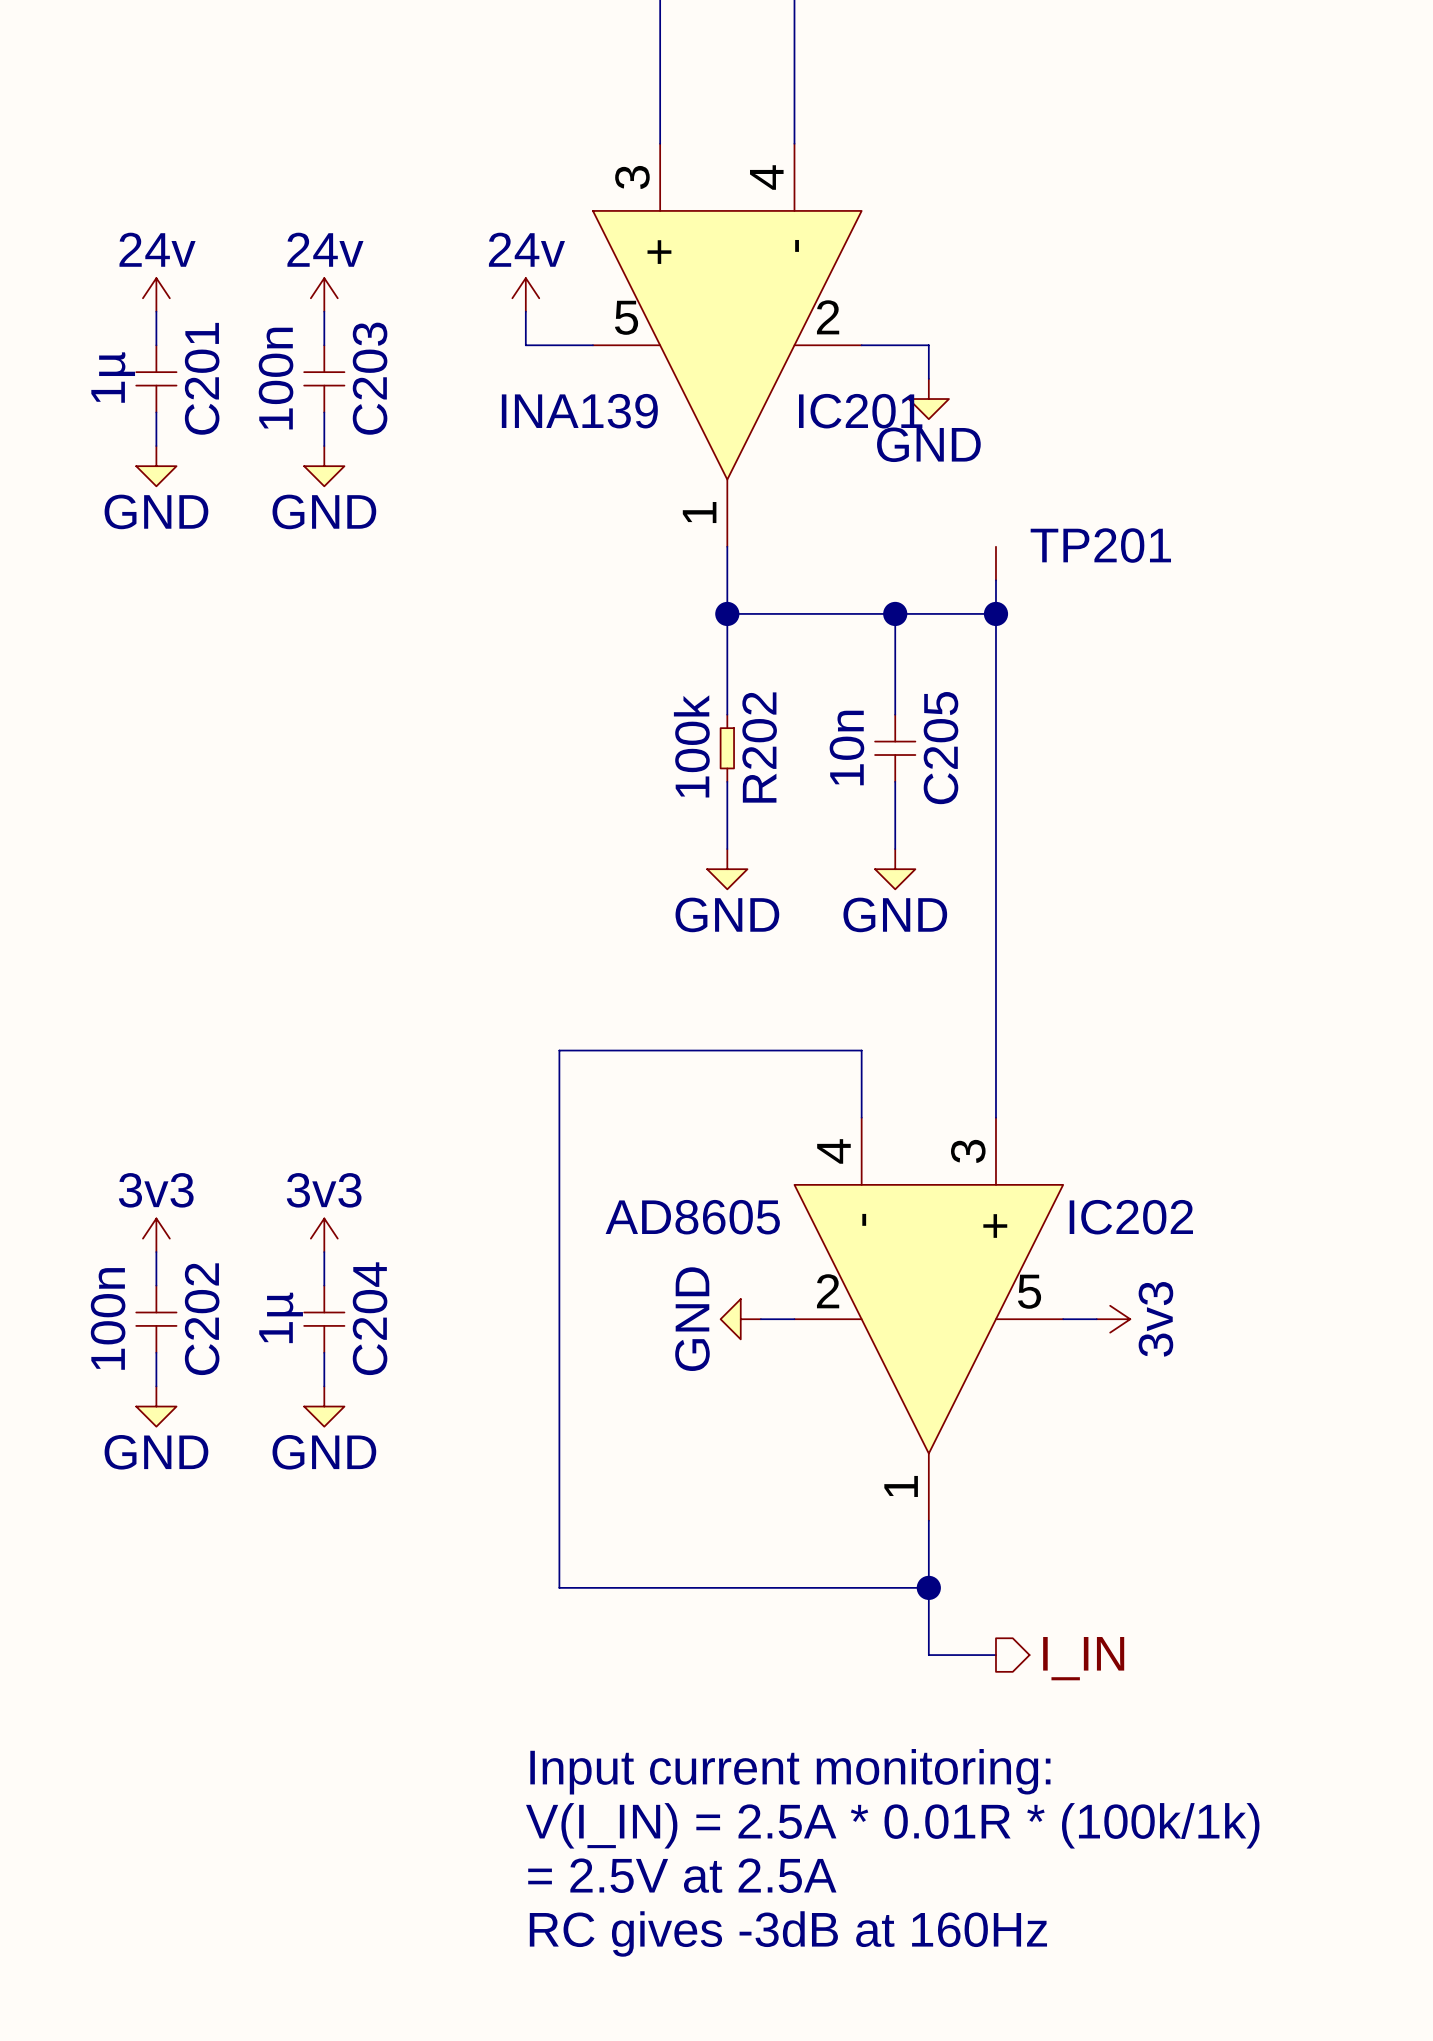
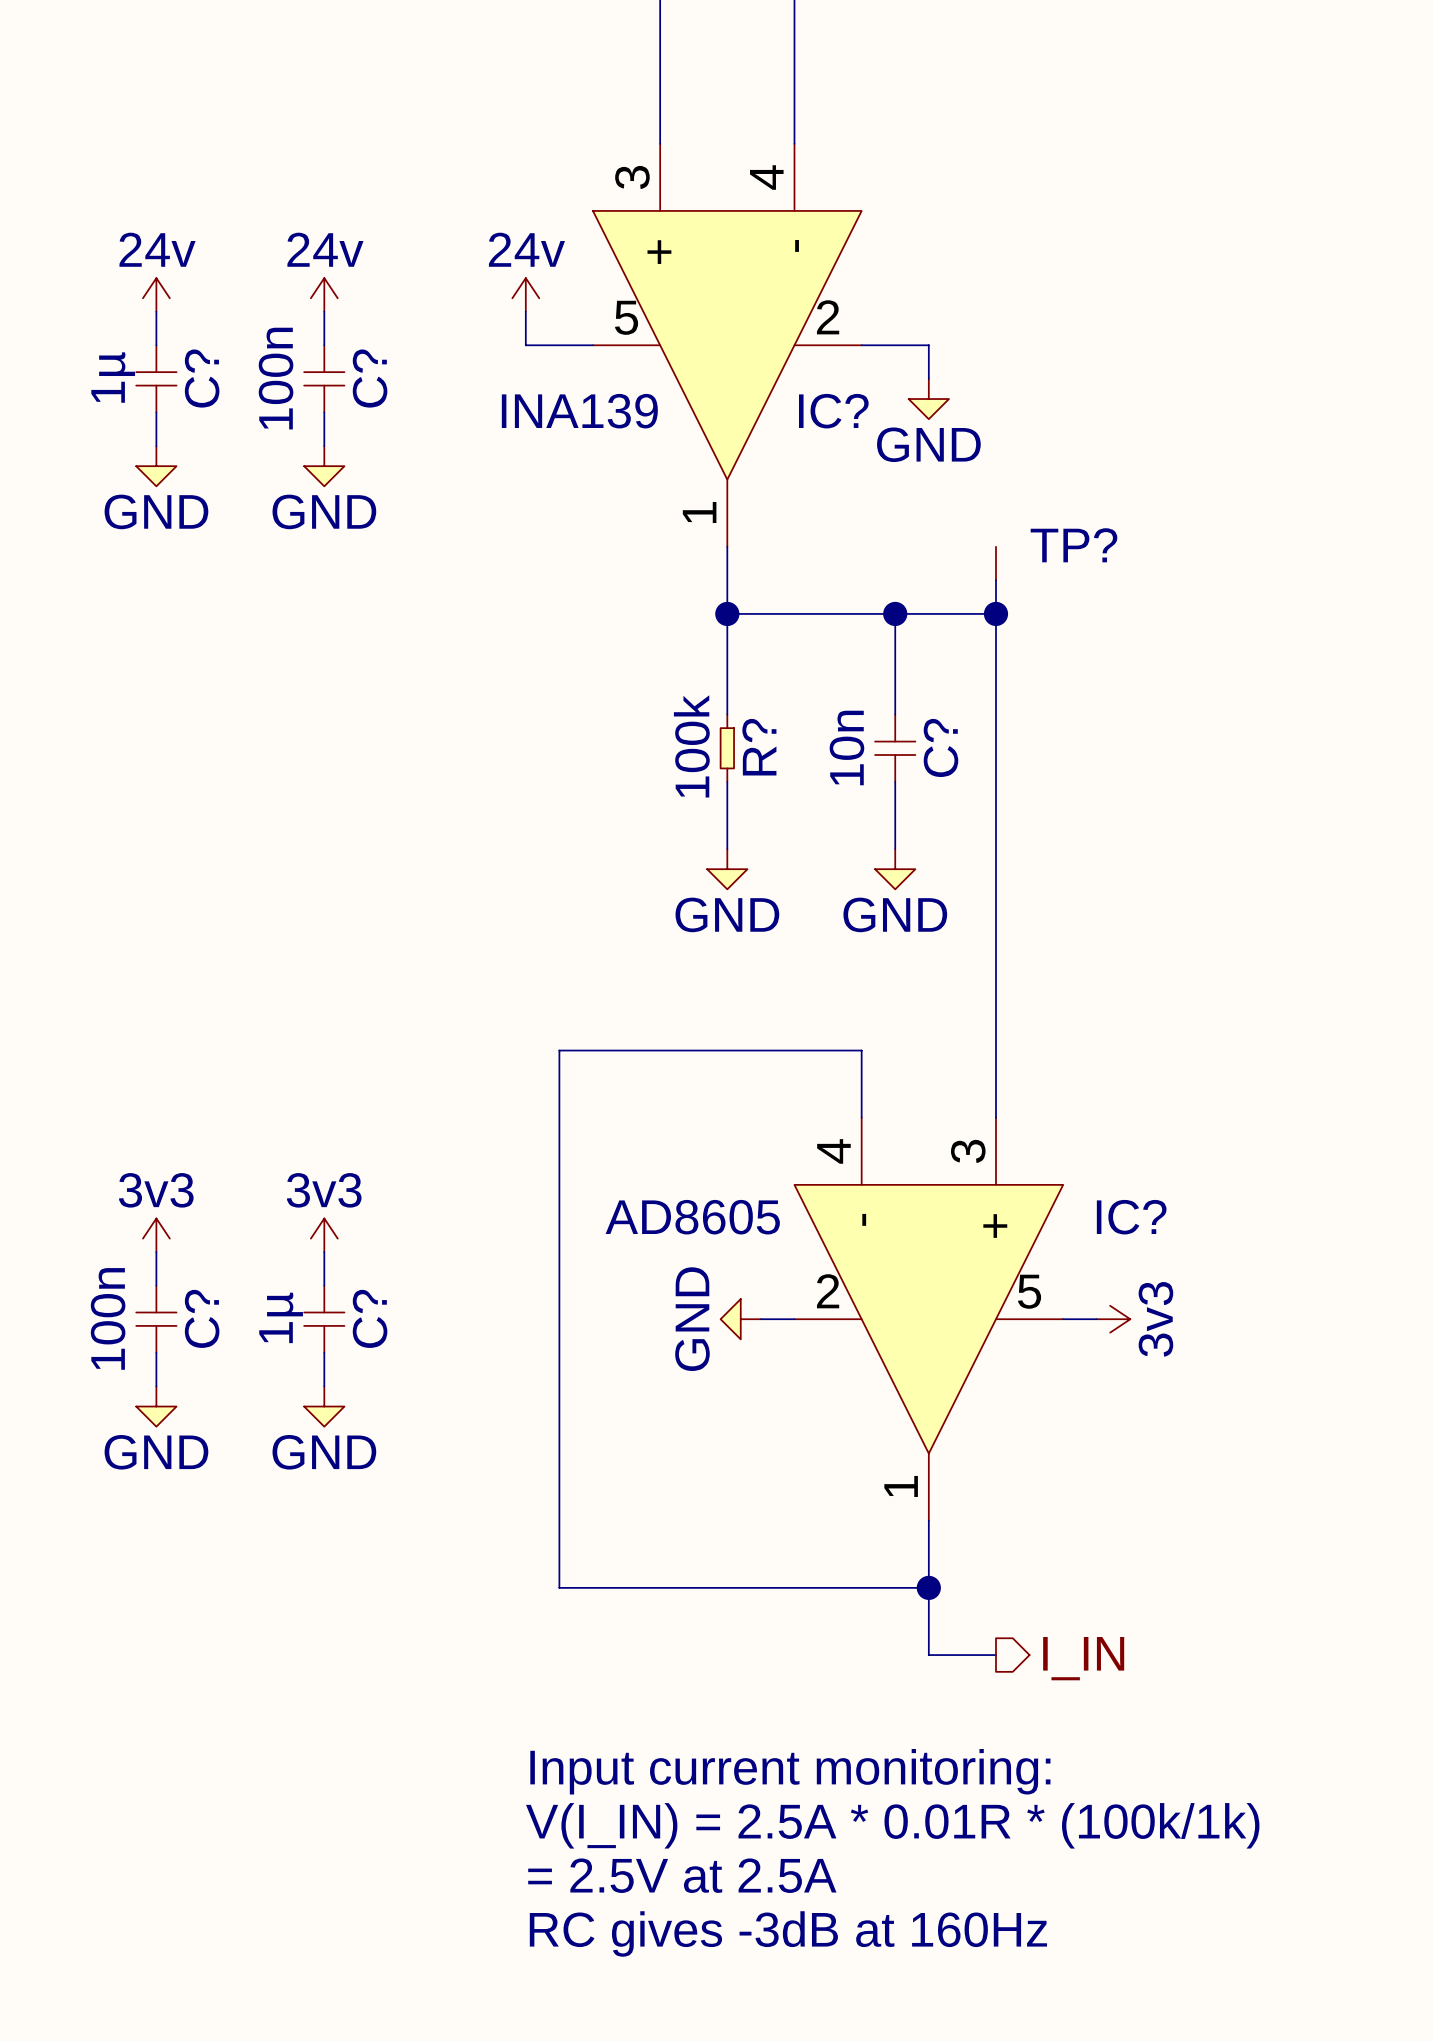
C201 name: C201 (202, 378) -> C? (202, 378)
C203 name: C203 (370, 378) -> C? (370, 378)
IC201 name: IC201 (860, 411) -> IC? (833, 411)
TP201 name: TP201 (1100, 545) -> TP? (1073, 545)
R202 name: R202 (759, 747) -> R? (759, 747)
C205 name: C205 (940, 748) -> C? (940, 747)
IC202 name: IC202 (1131, 1217) -> IC? (1131, 1217)
C204 name: C204 (370, 1318) -> C? (370, 1318)
C202 name: C202 (202, 1319) -> C? (202, 1318)

